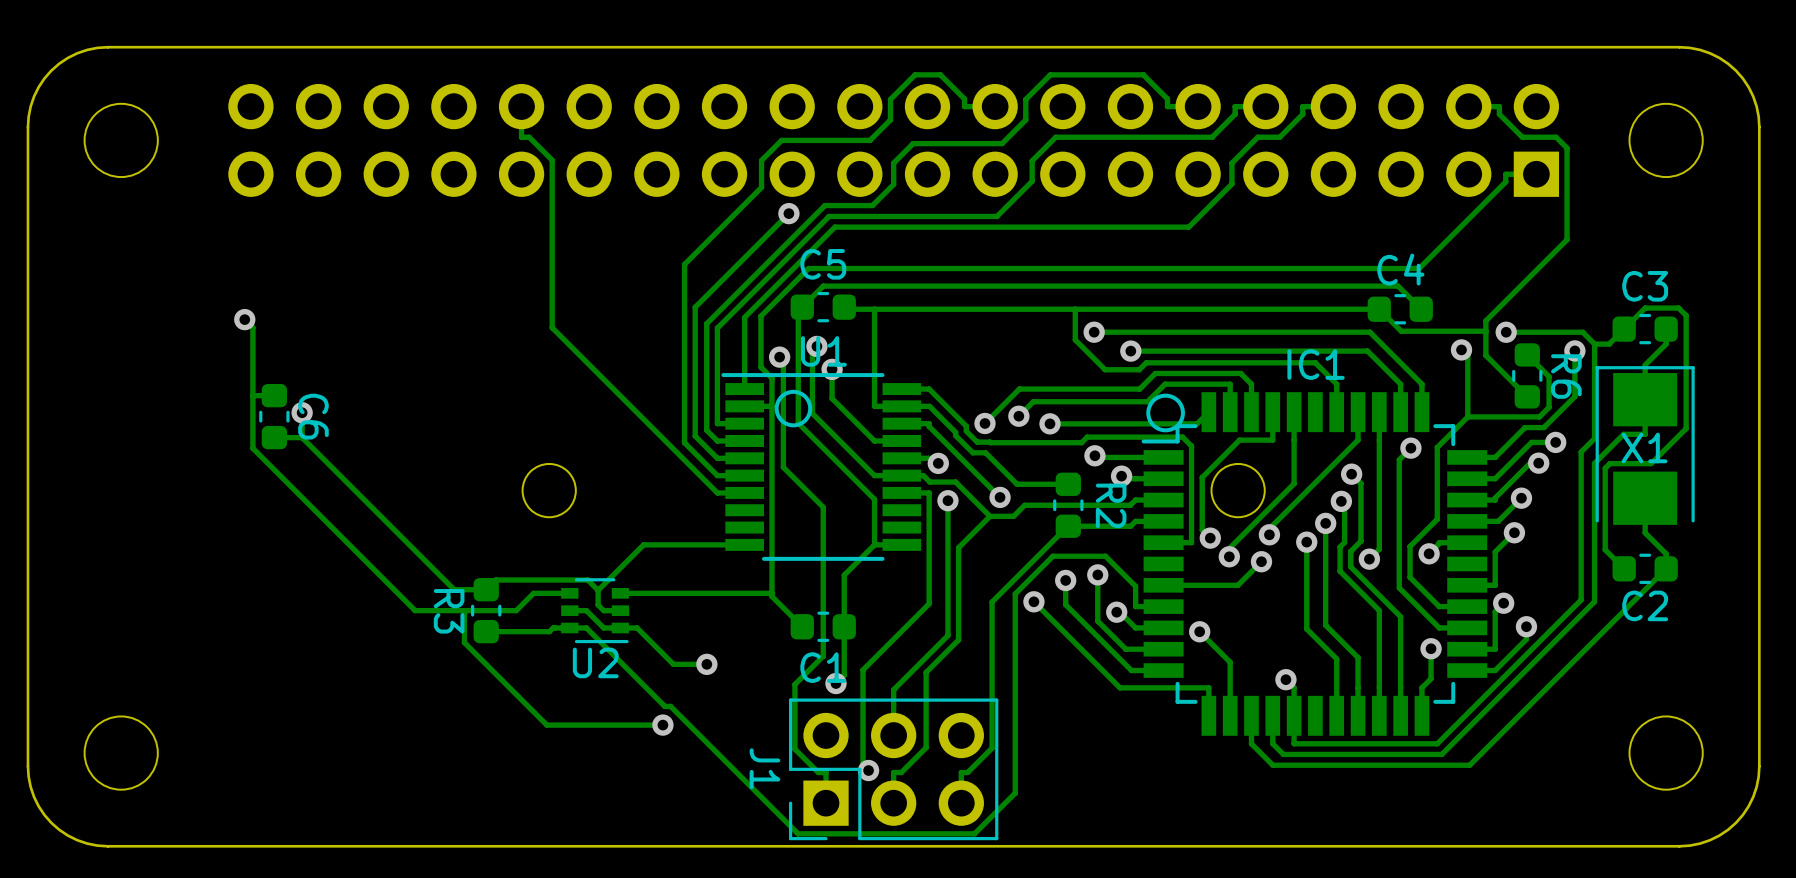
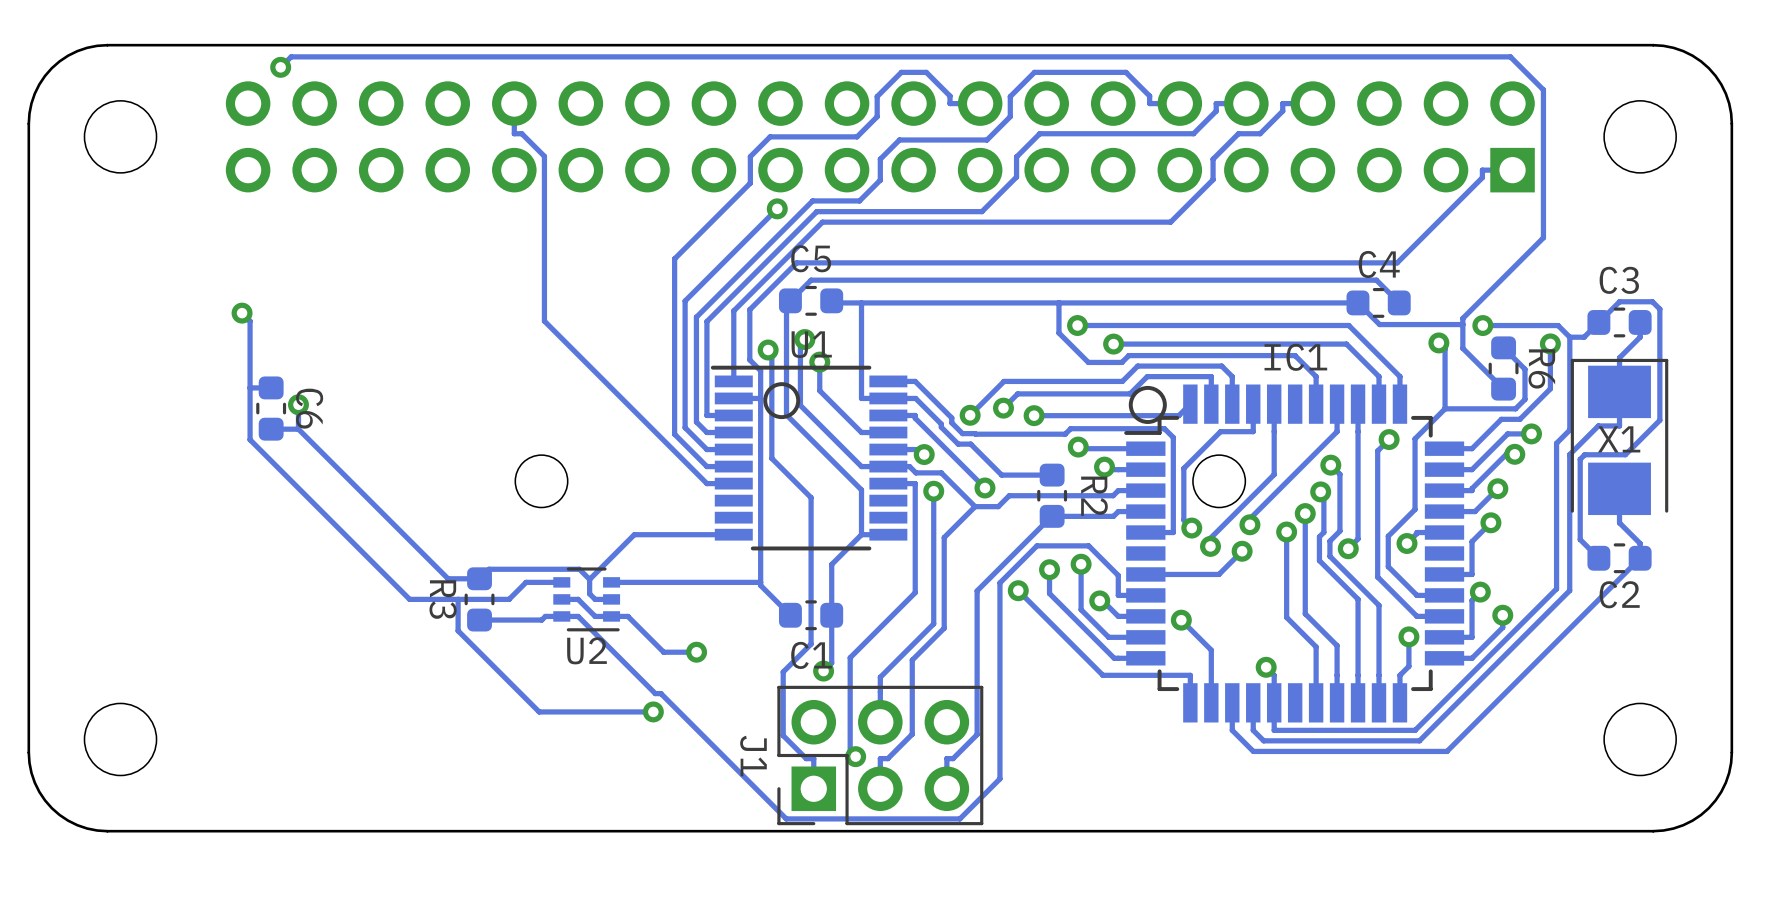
via: none -> (280, 67)
track: (1468, 106) (1499, 106) (1499, 114) (1522, 137) (1556, 137) (1567, 148) (1567, 239) (1485, 320) (1485, 324) -> (280, 67) (291, 56) (1510, 56) (1543, 89) (1543, 237) (1462, 318)

